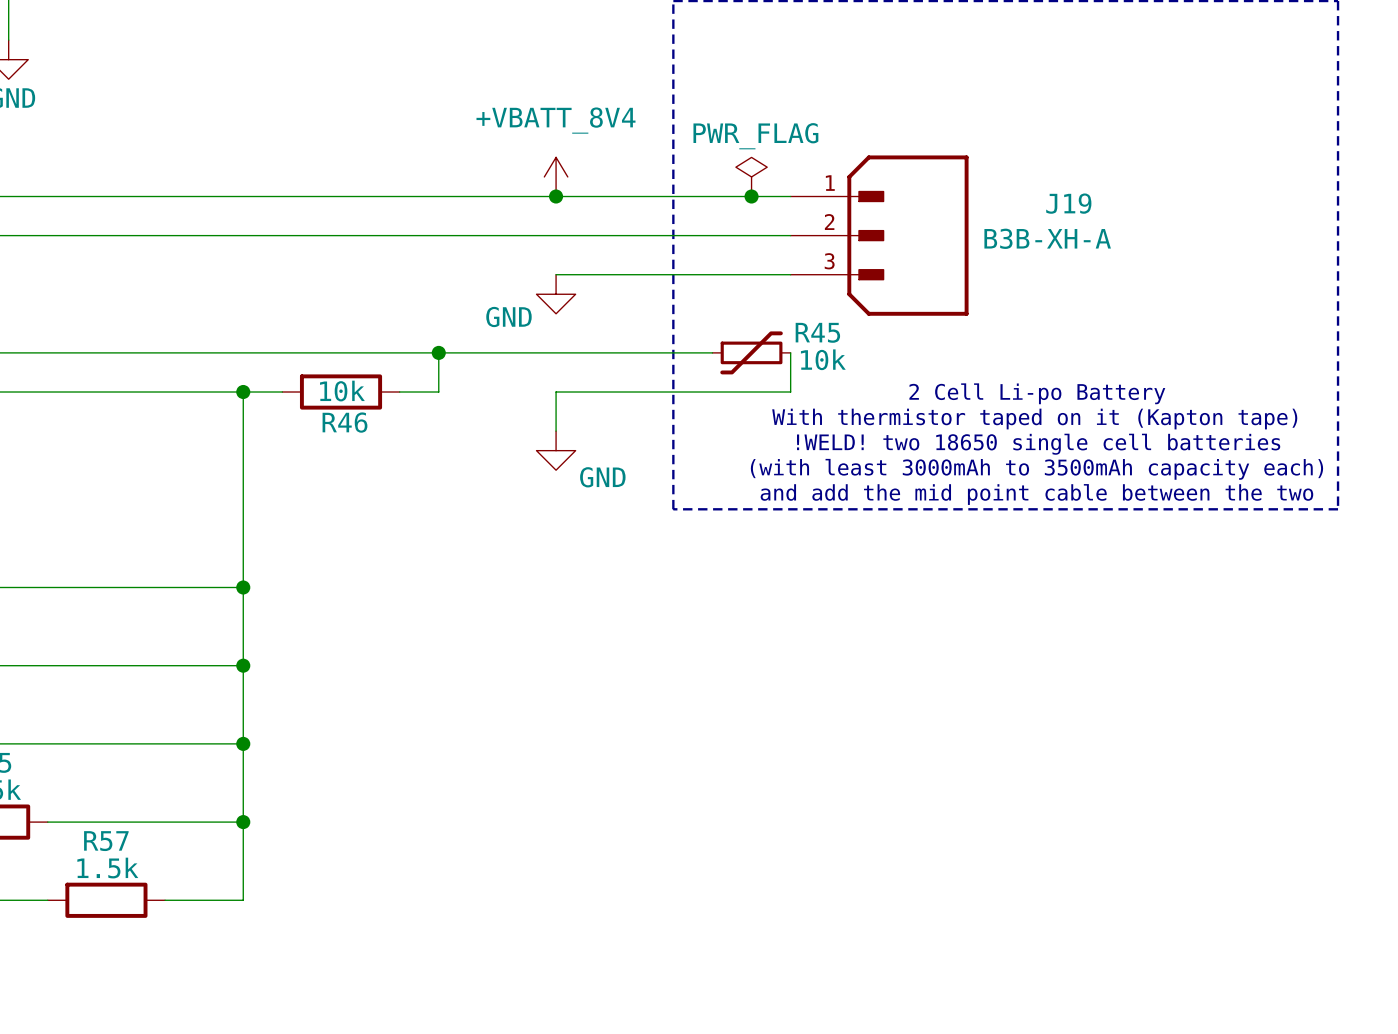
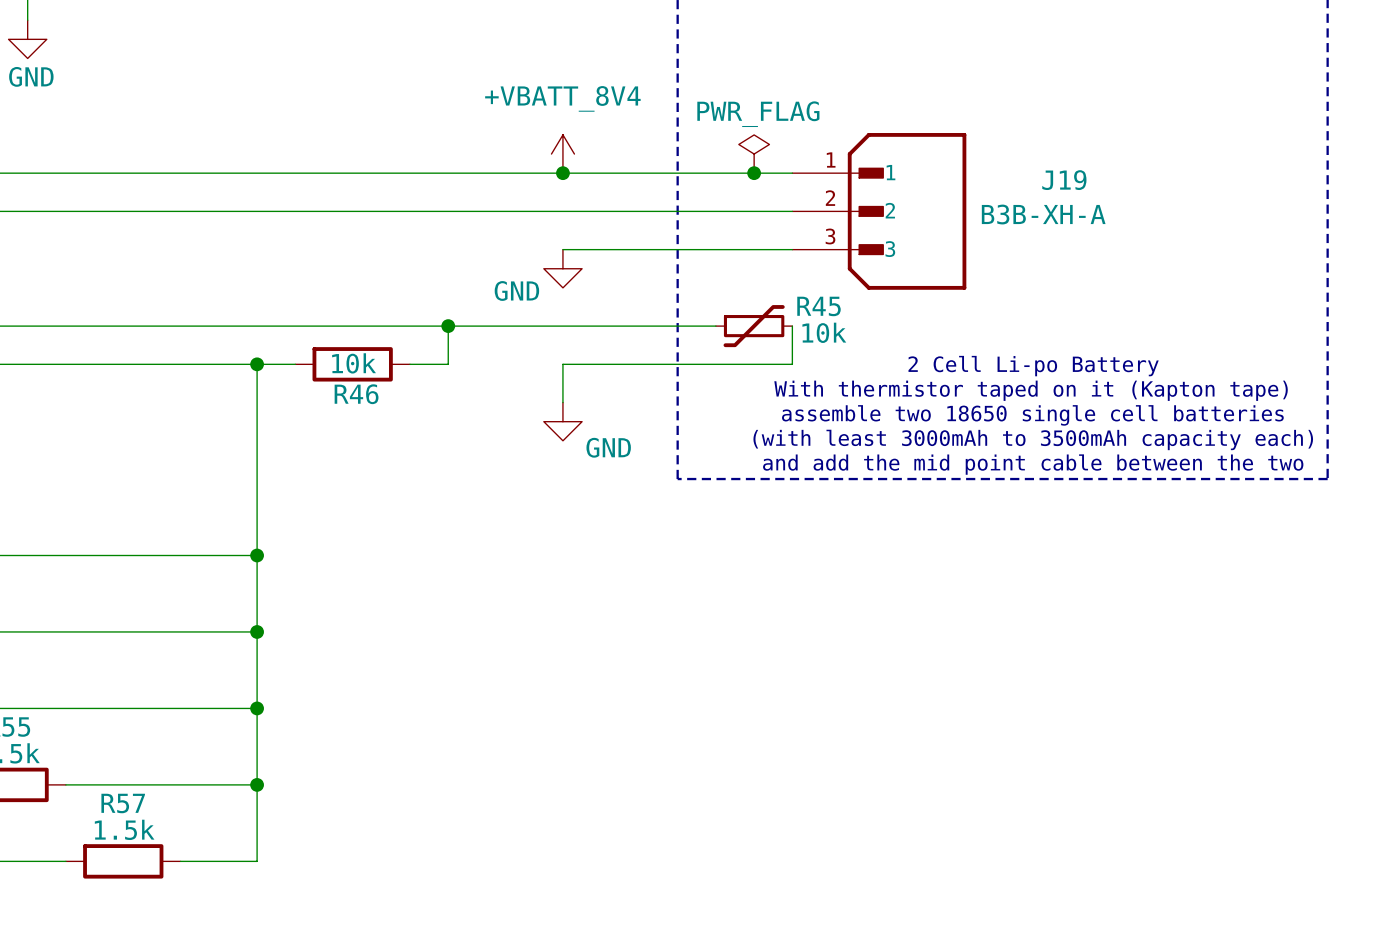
J19 pin name: none -> 1 (890, 172)
J19 pin name: none -> 2 (890, 210)
J19 pin name: none -> 3 (890, 249)
text: !WELD! two 18650 single cell batteries (1038, 444) -> assemble two 18650 single cell batteries (1032, 415)

